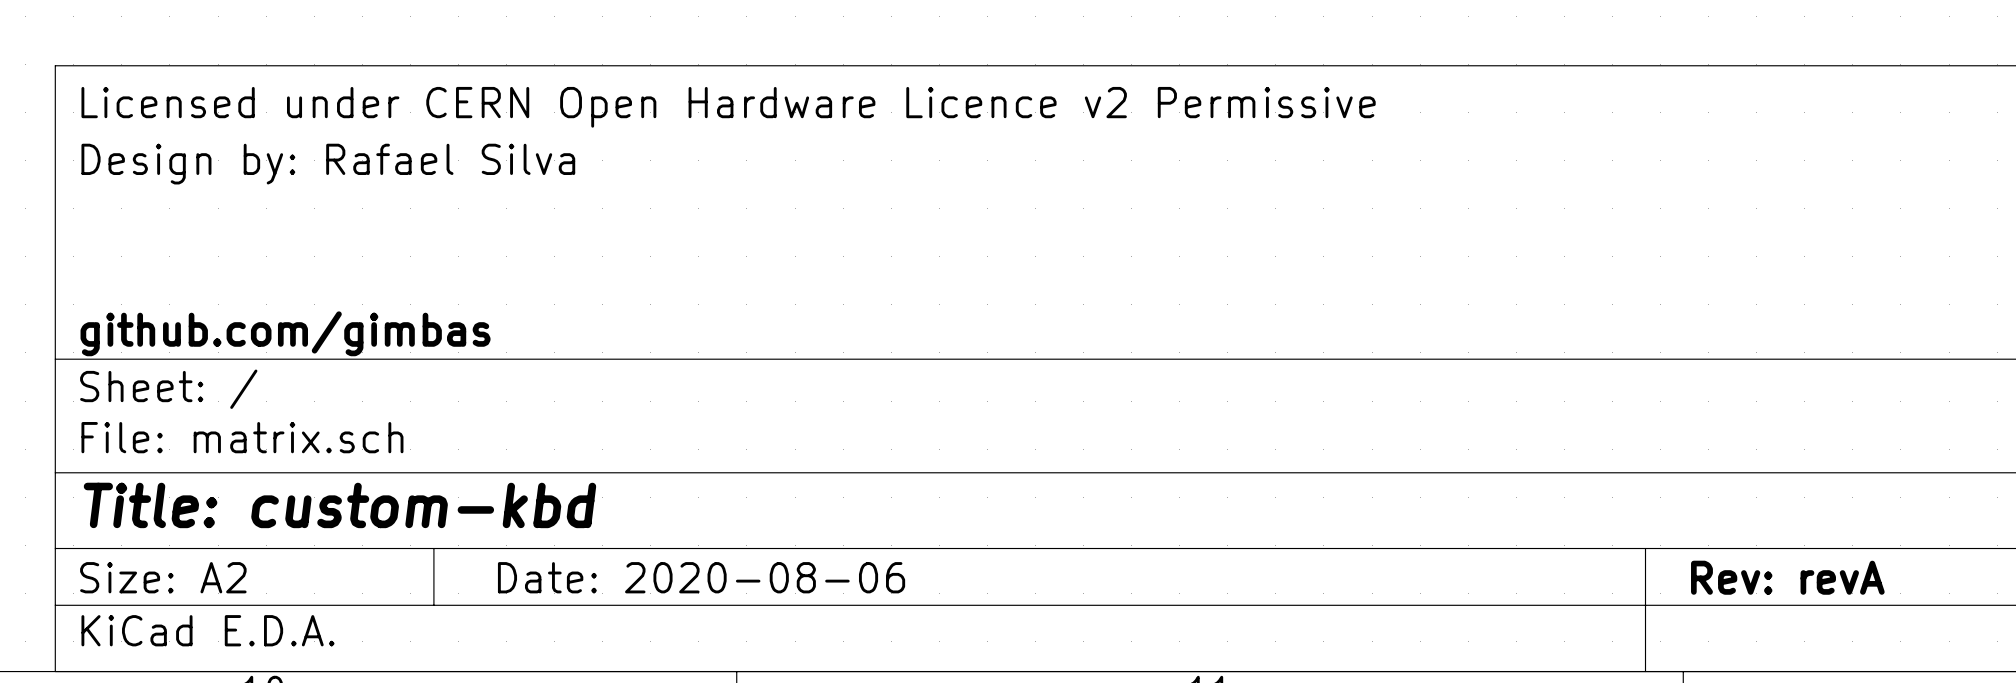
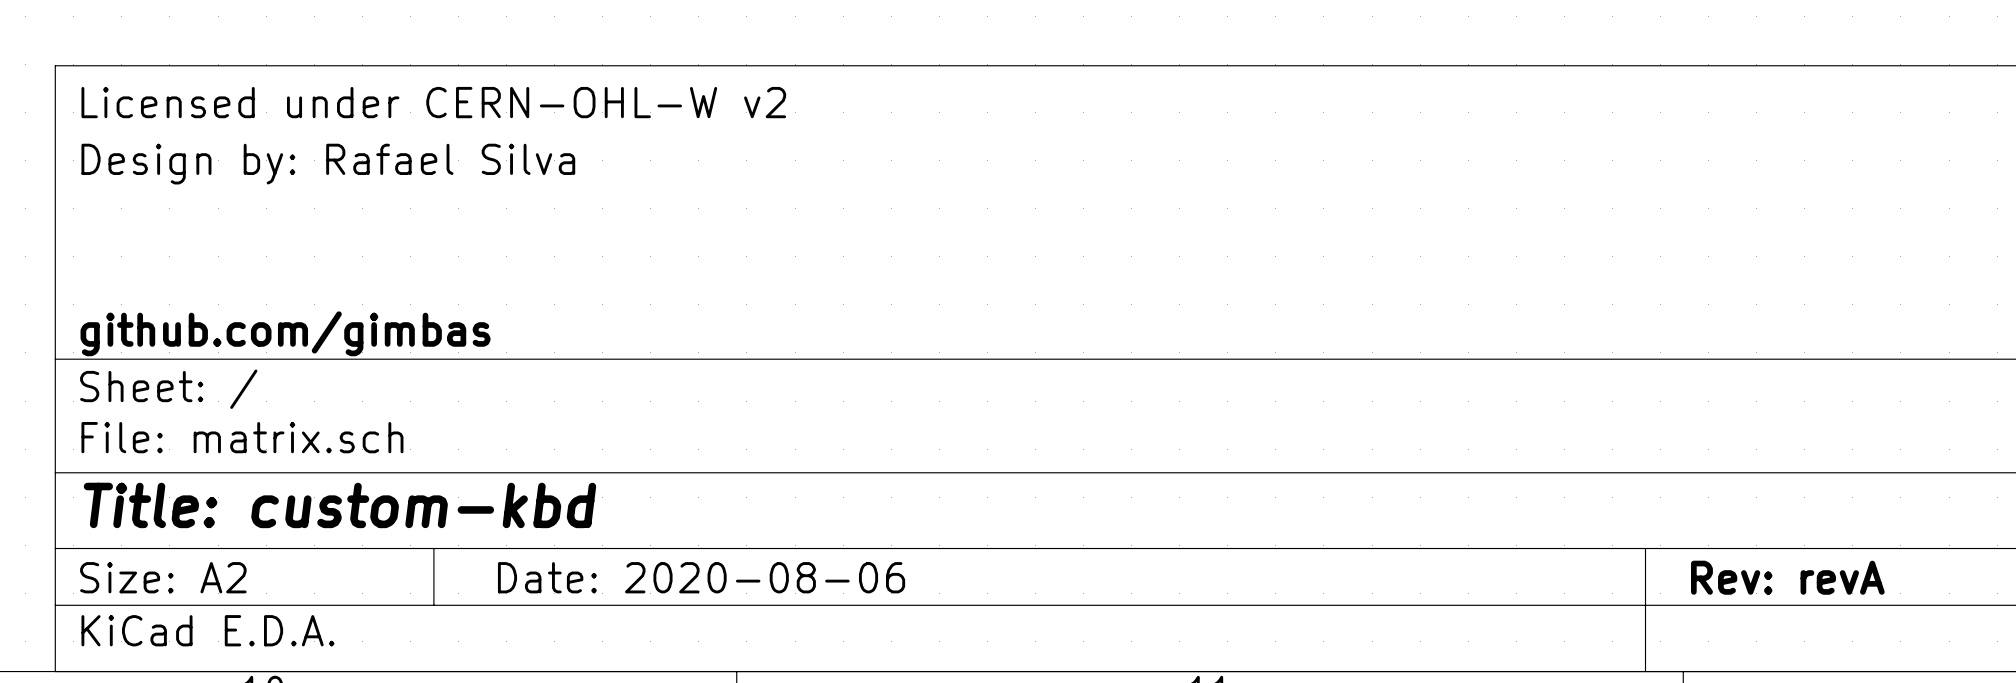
title block: Licensed under CERN Open Hardware Licence v2 Permissive (728, 107) -> Licensed under CERN-OHL-W v2 (433, 102)

